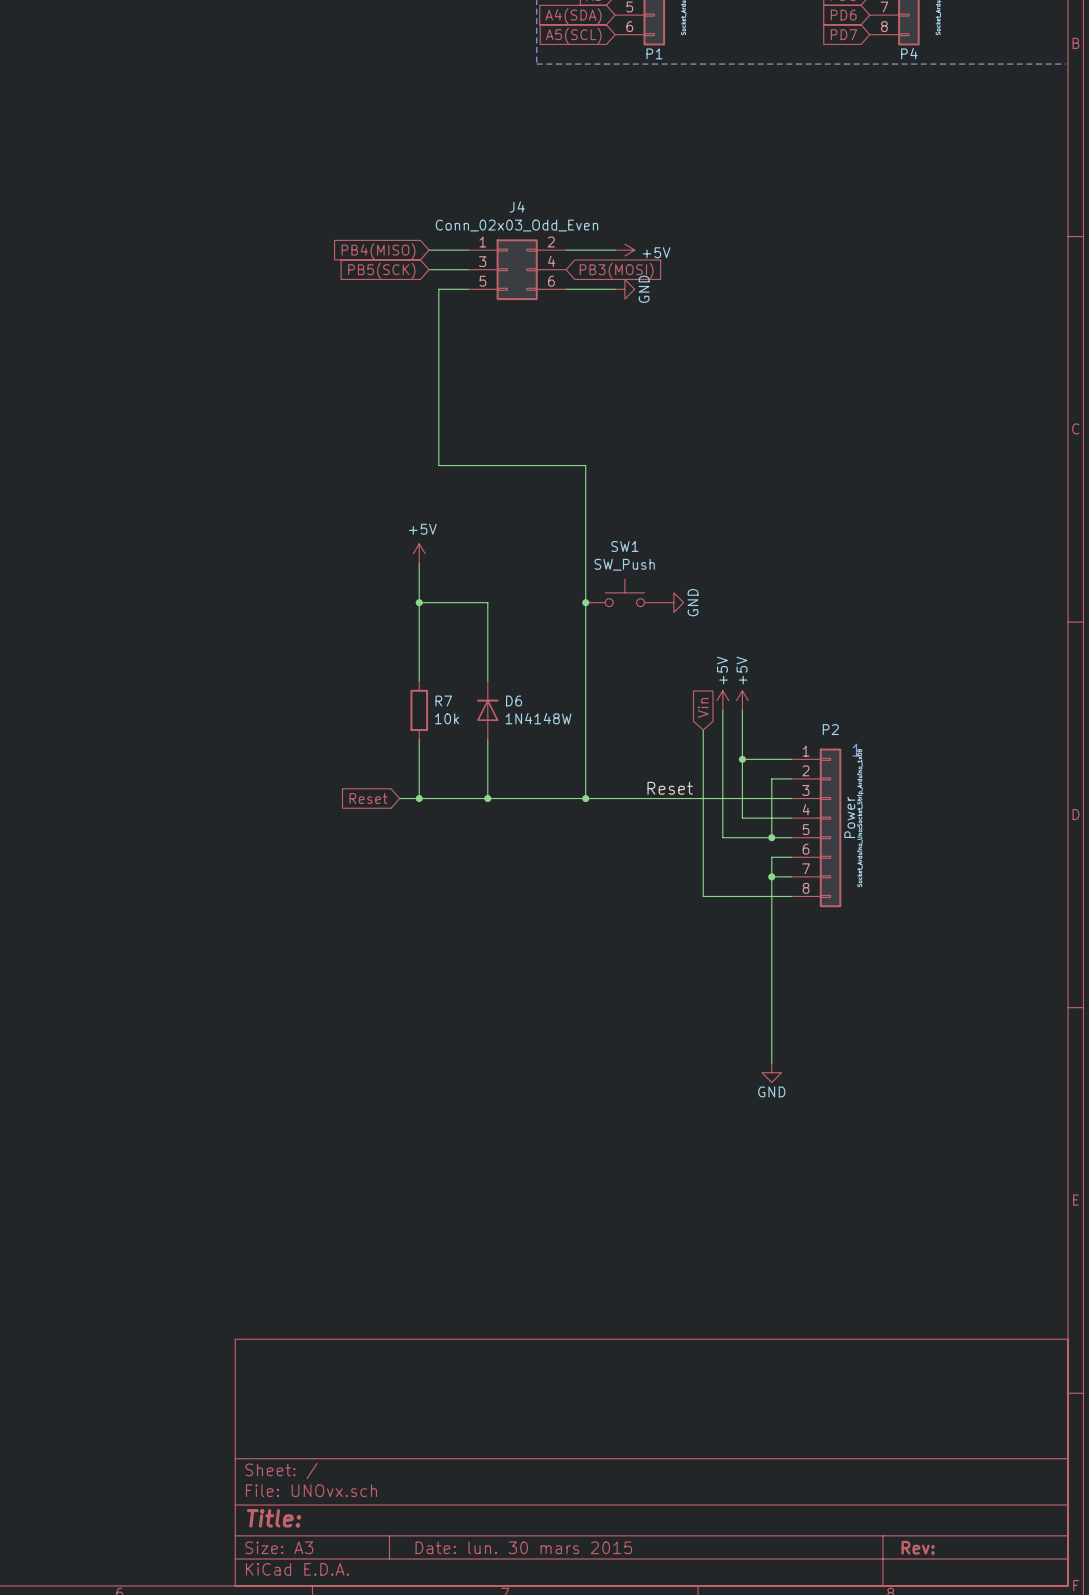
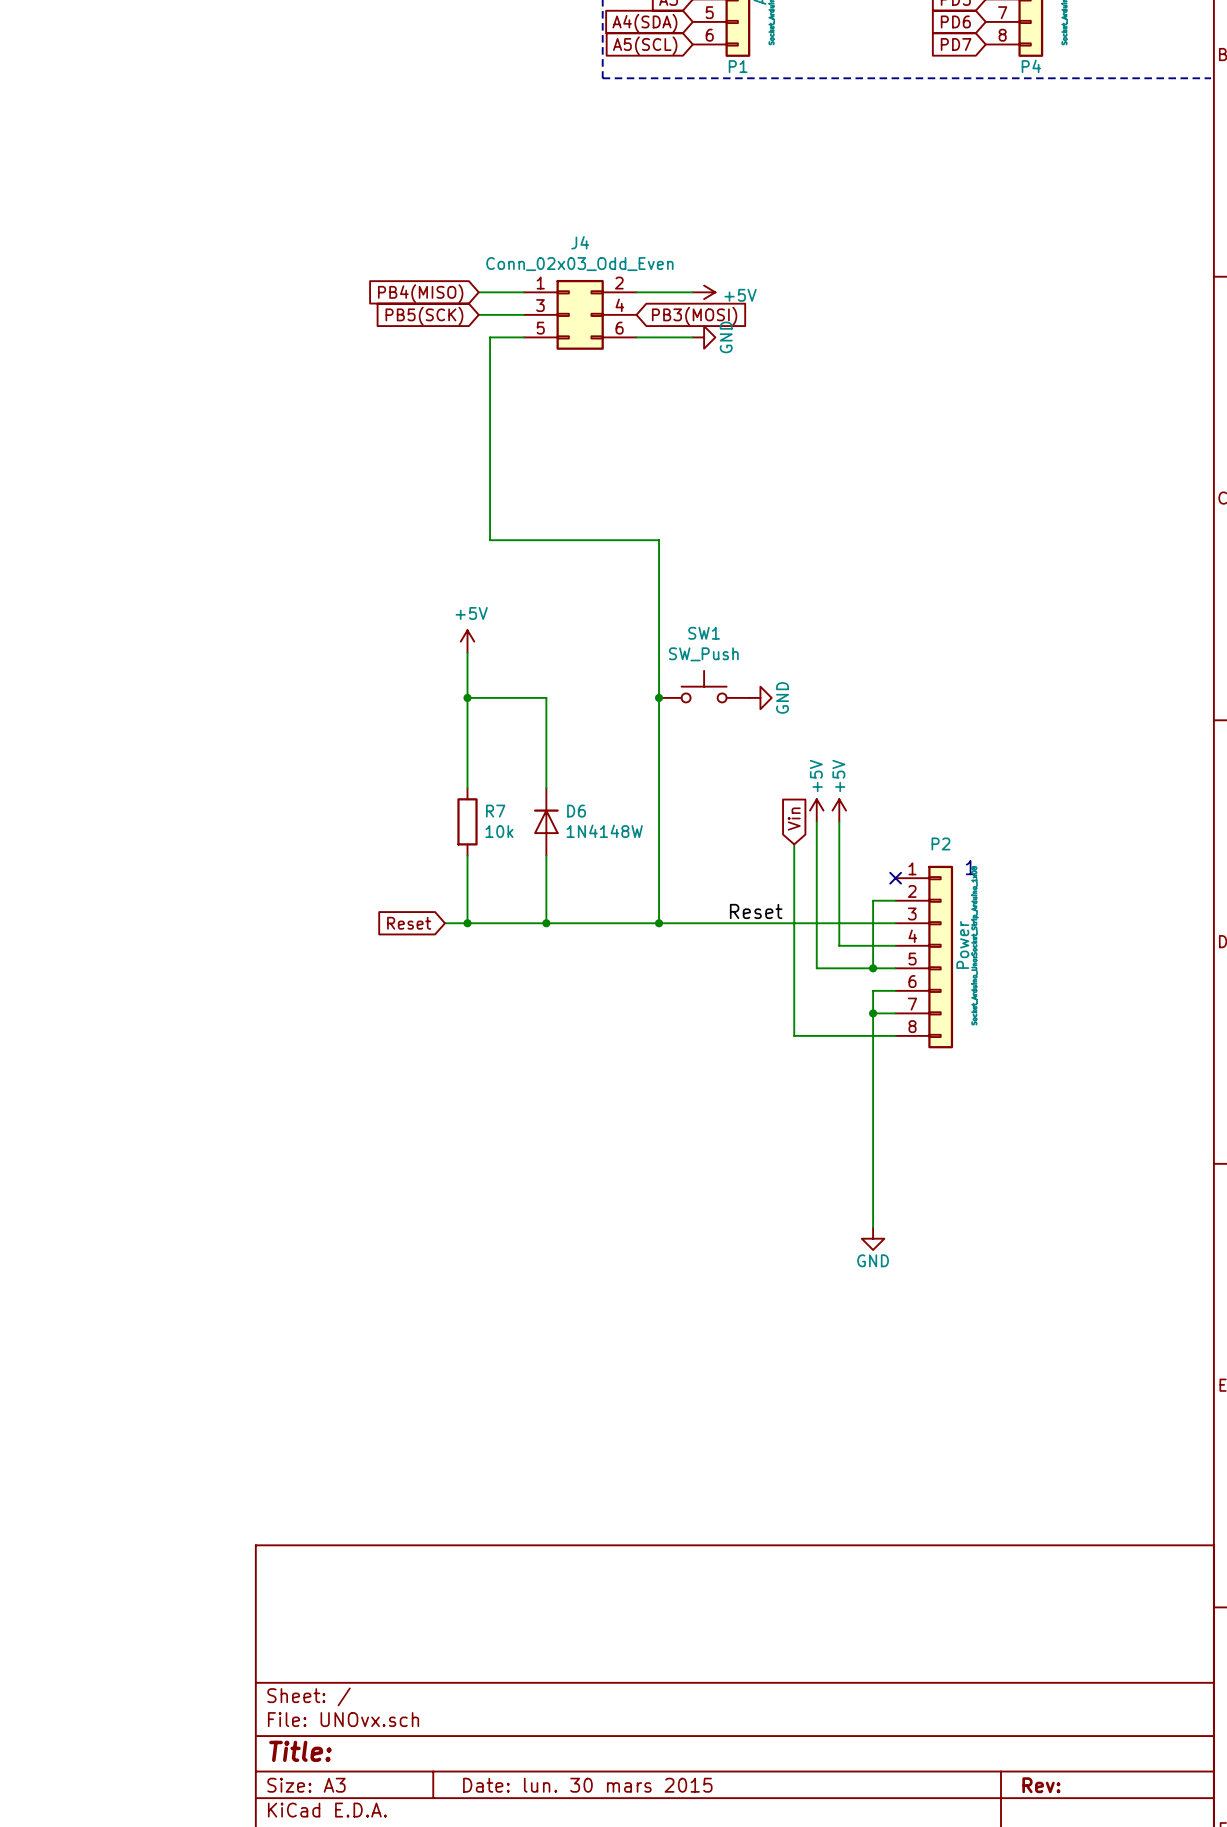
wire: (742, 759) (791, 759) -> none
junction: (742, 759) -> none
no-connect mark: none -> (895, 878)

